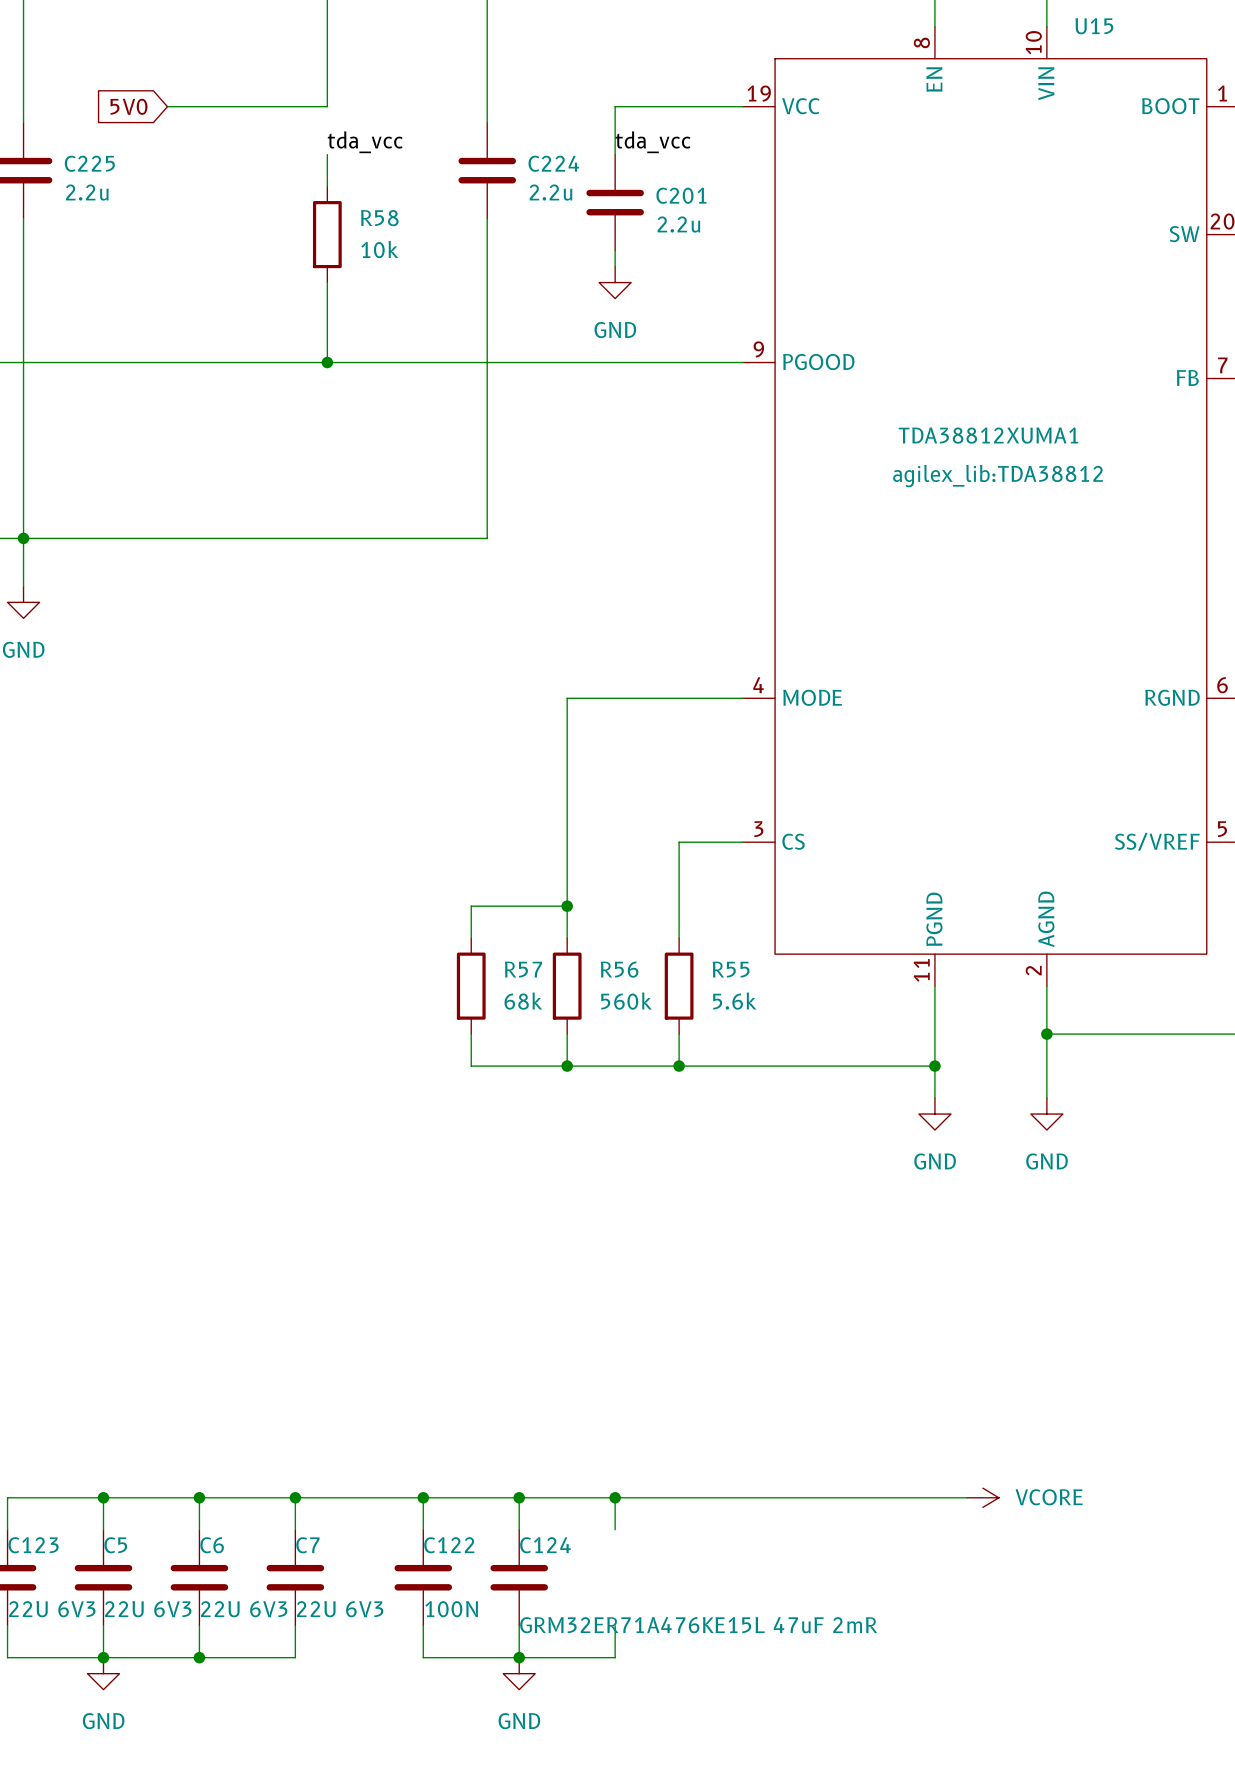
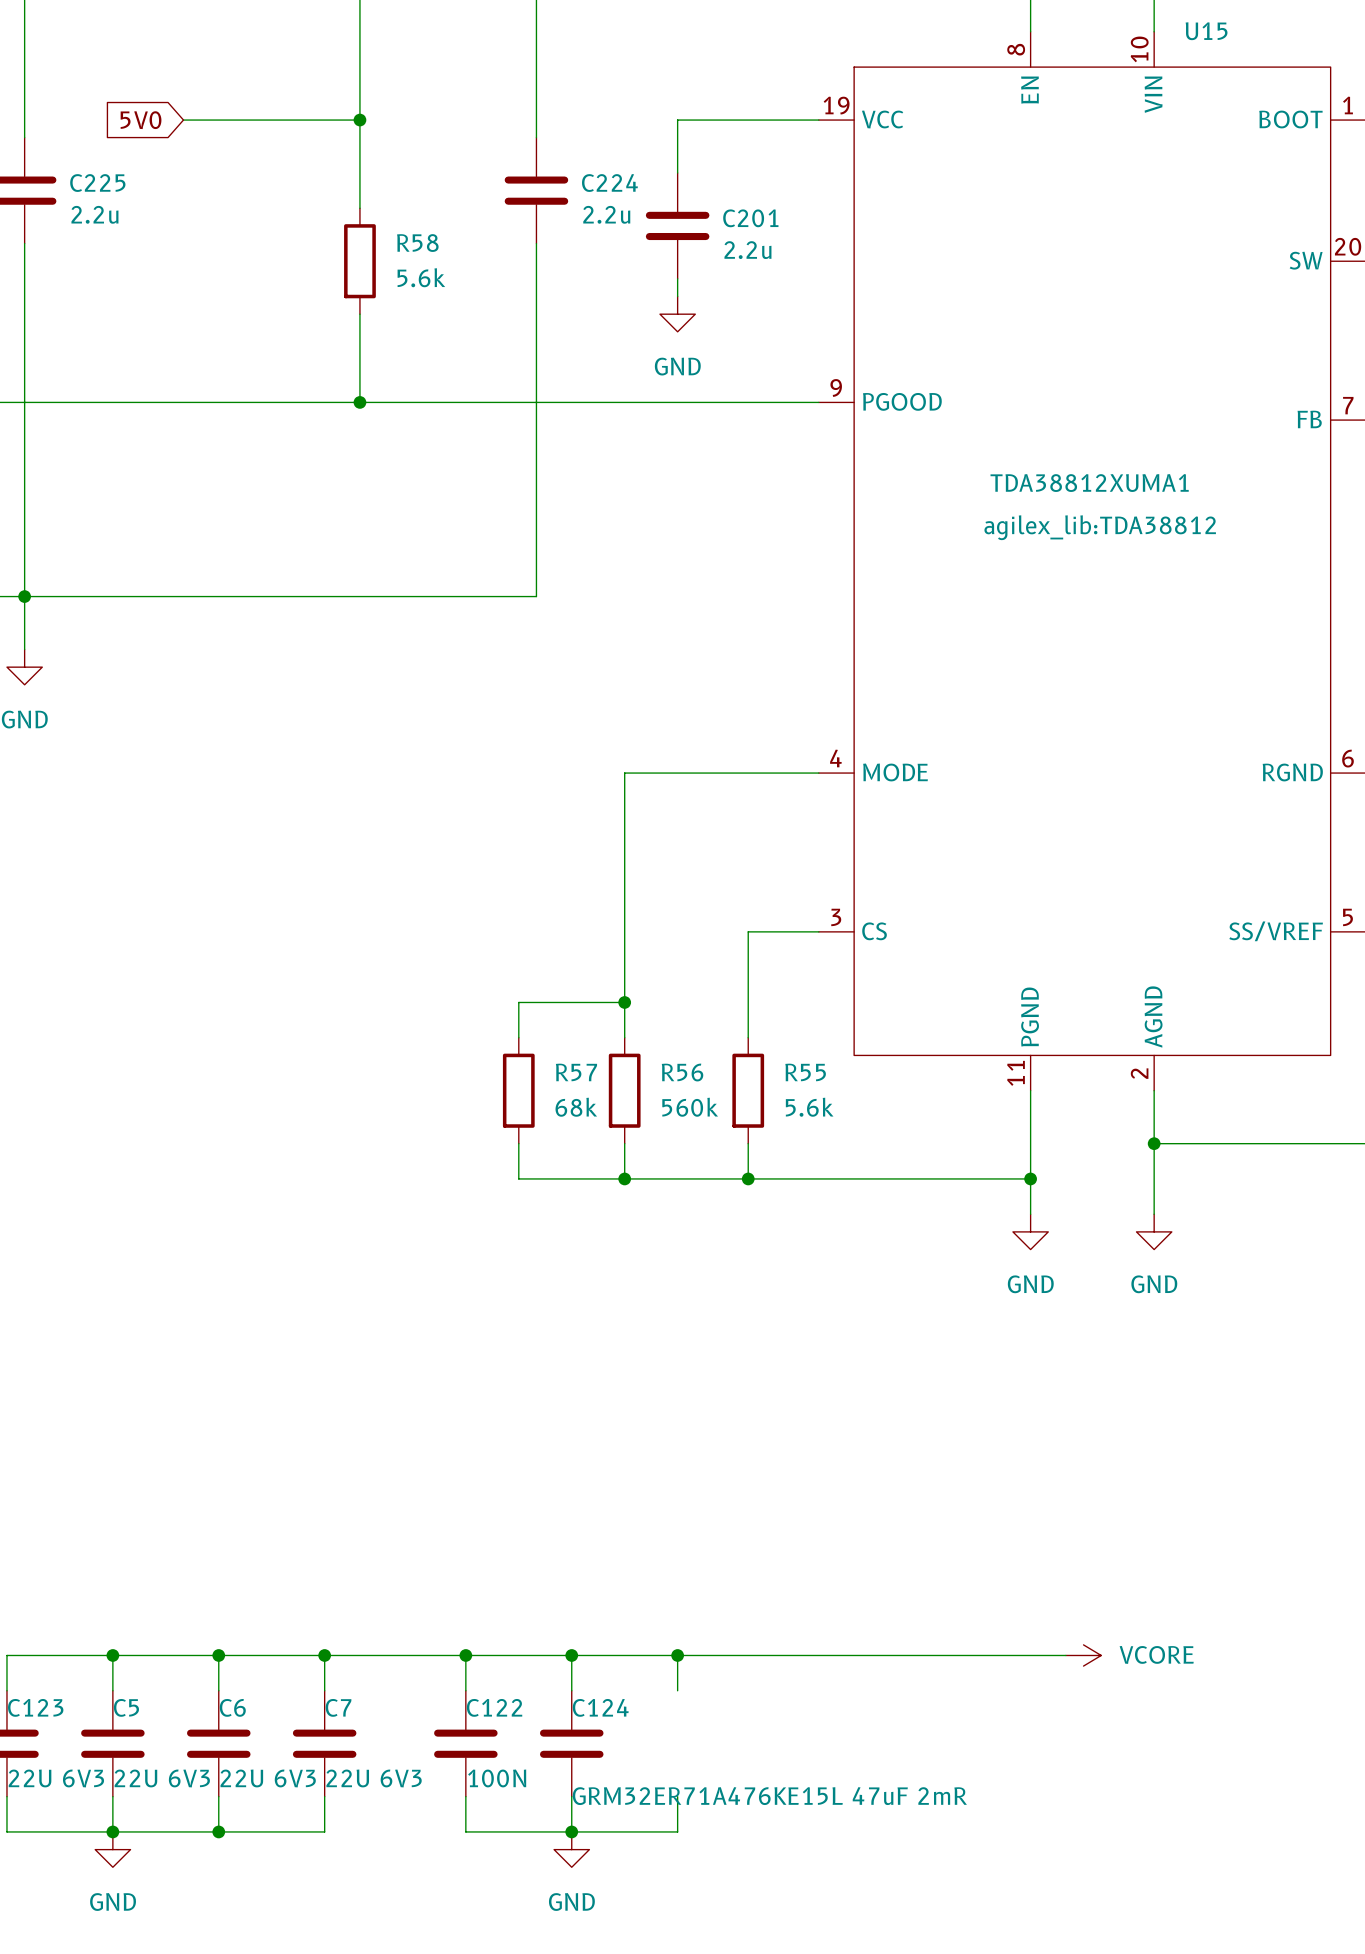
wire: none -> (359, 120) (359, 172)
junction: none -> (359, 120)
label: tda_vcc (365, 142) -> none
label: tda_vcc (653, 142) -> none
R58 value: 10k (379, 249) -> 5.6k (421, 277)

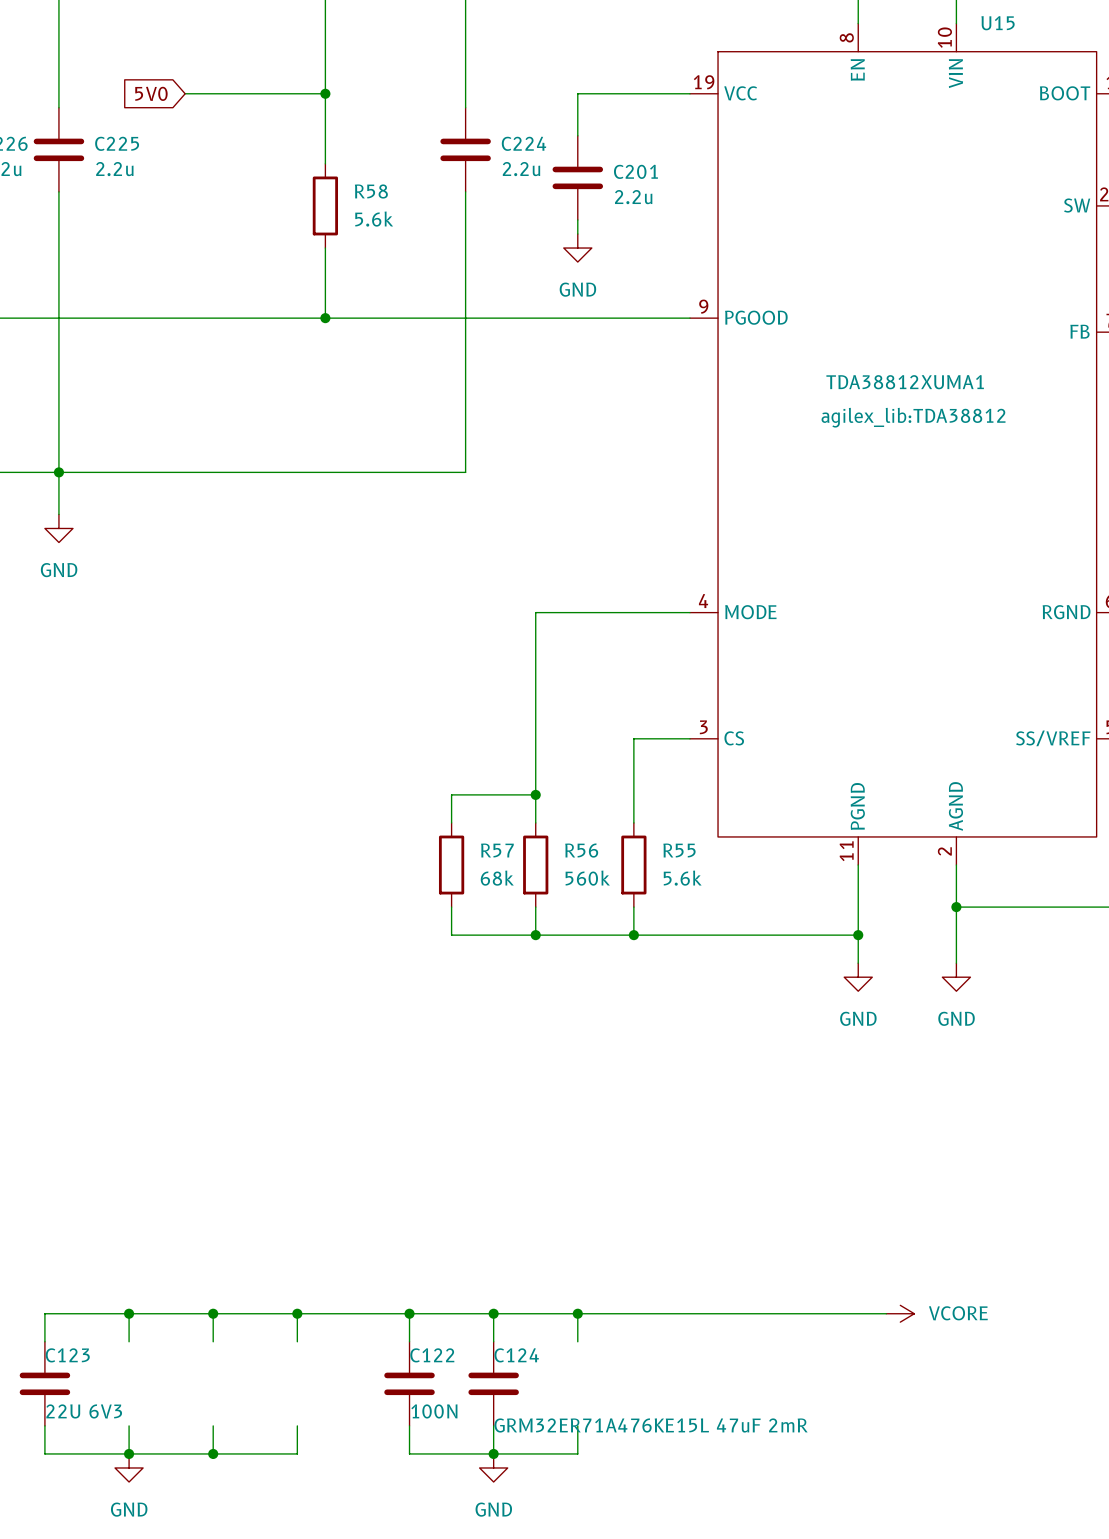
C5: 22U 6V3 (112, 1743) -> none
C6: 22U 6V3 (218, 1743) -> none
C7: 22U 6V3 (324, 1743) -> none

